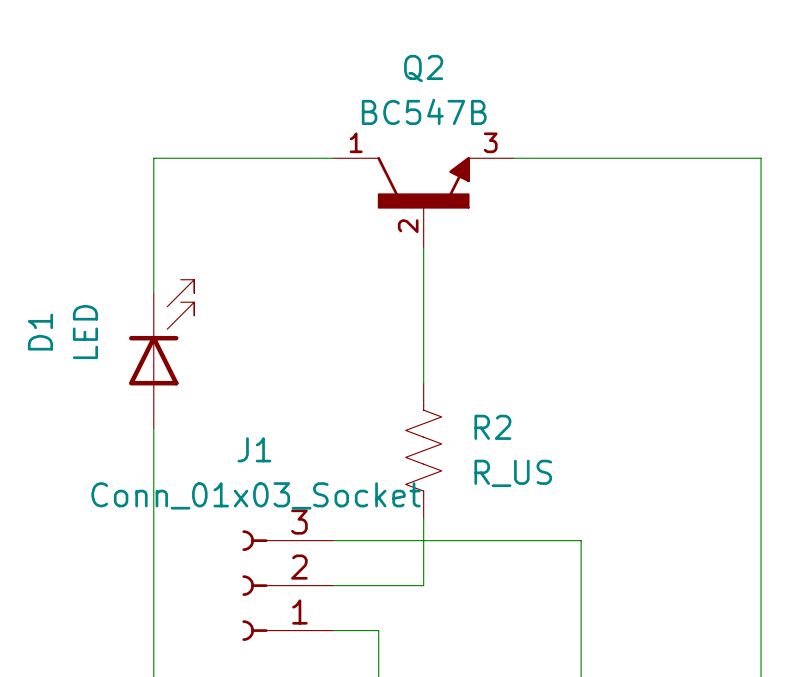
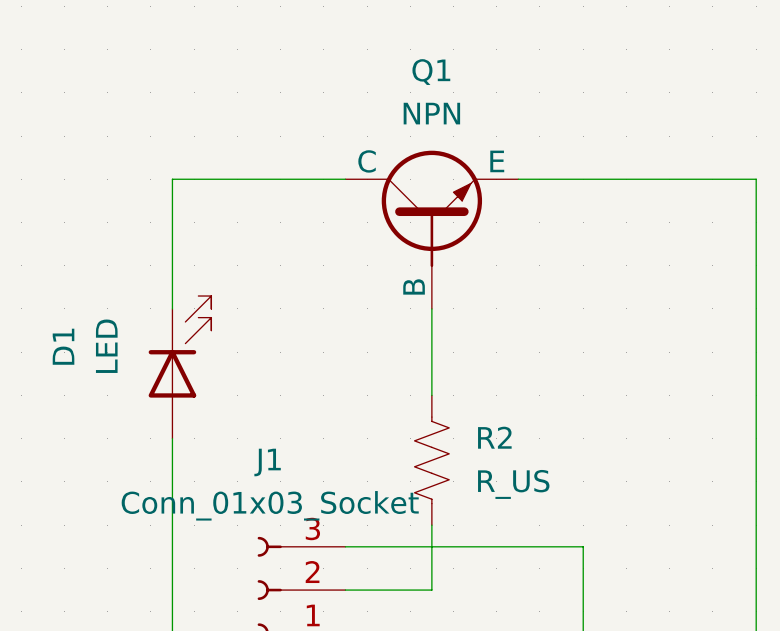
Q2: BC547B (423, 202) -> none
Q1: none -> NPN (431, 229)

